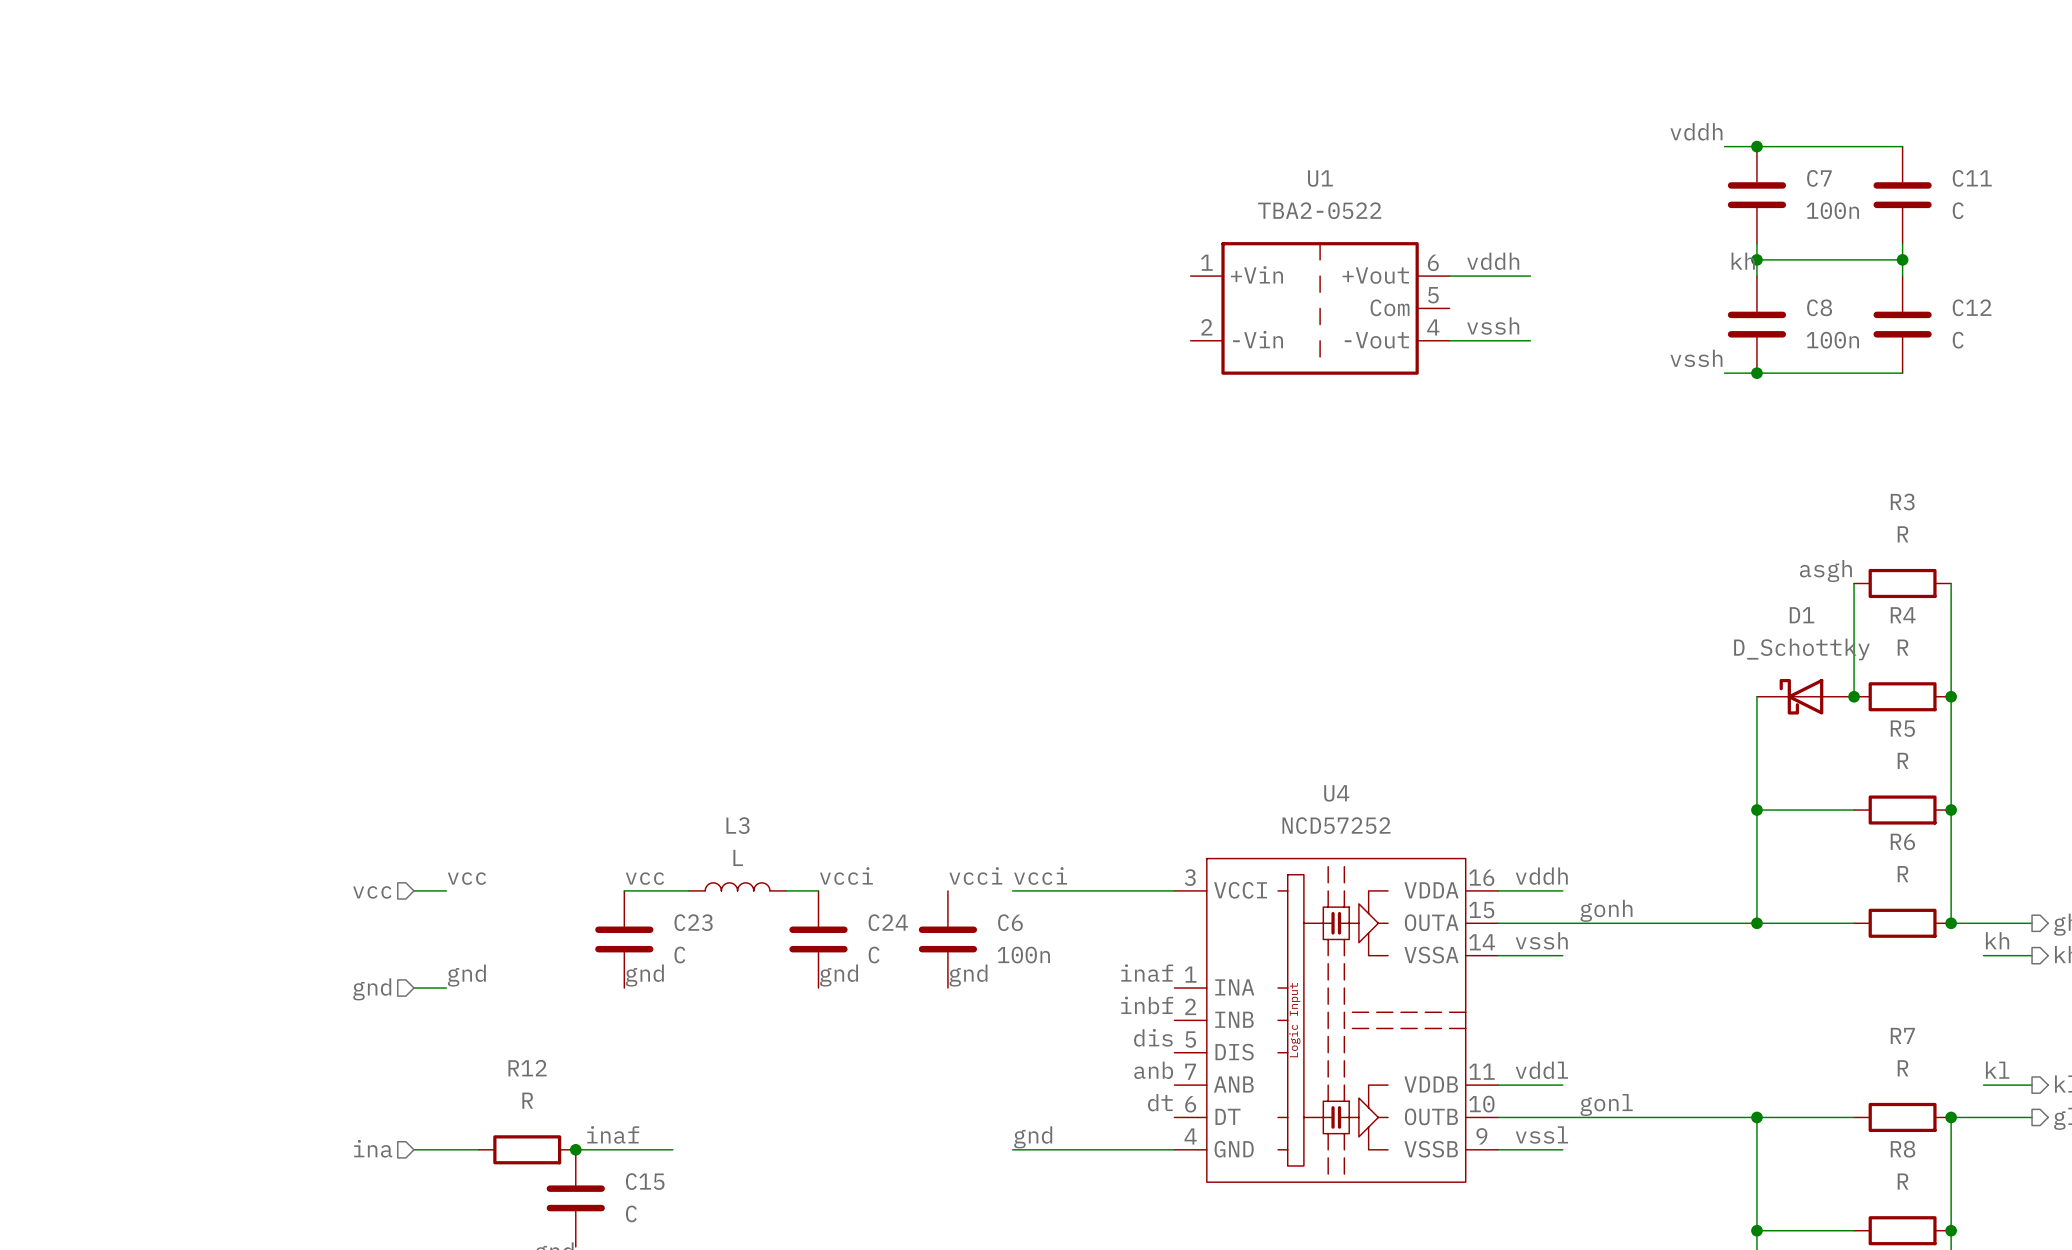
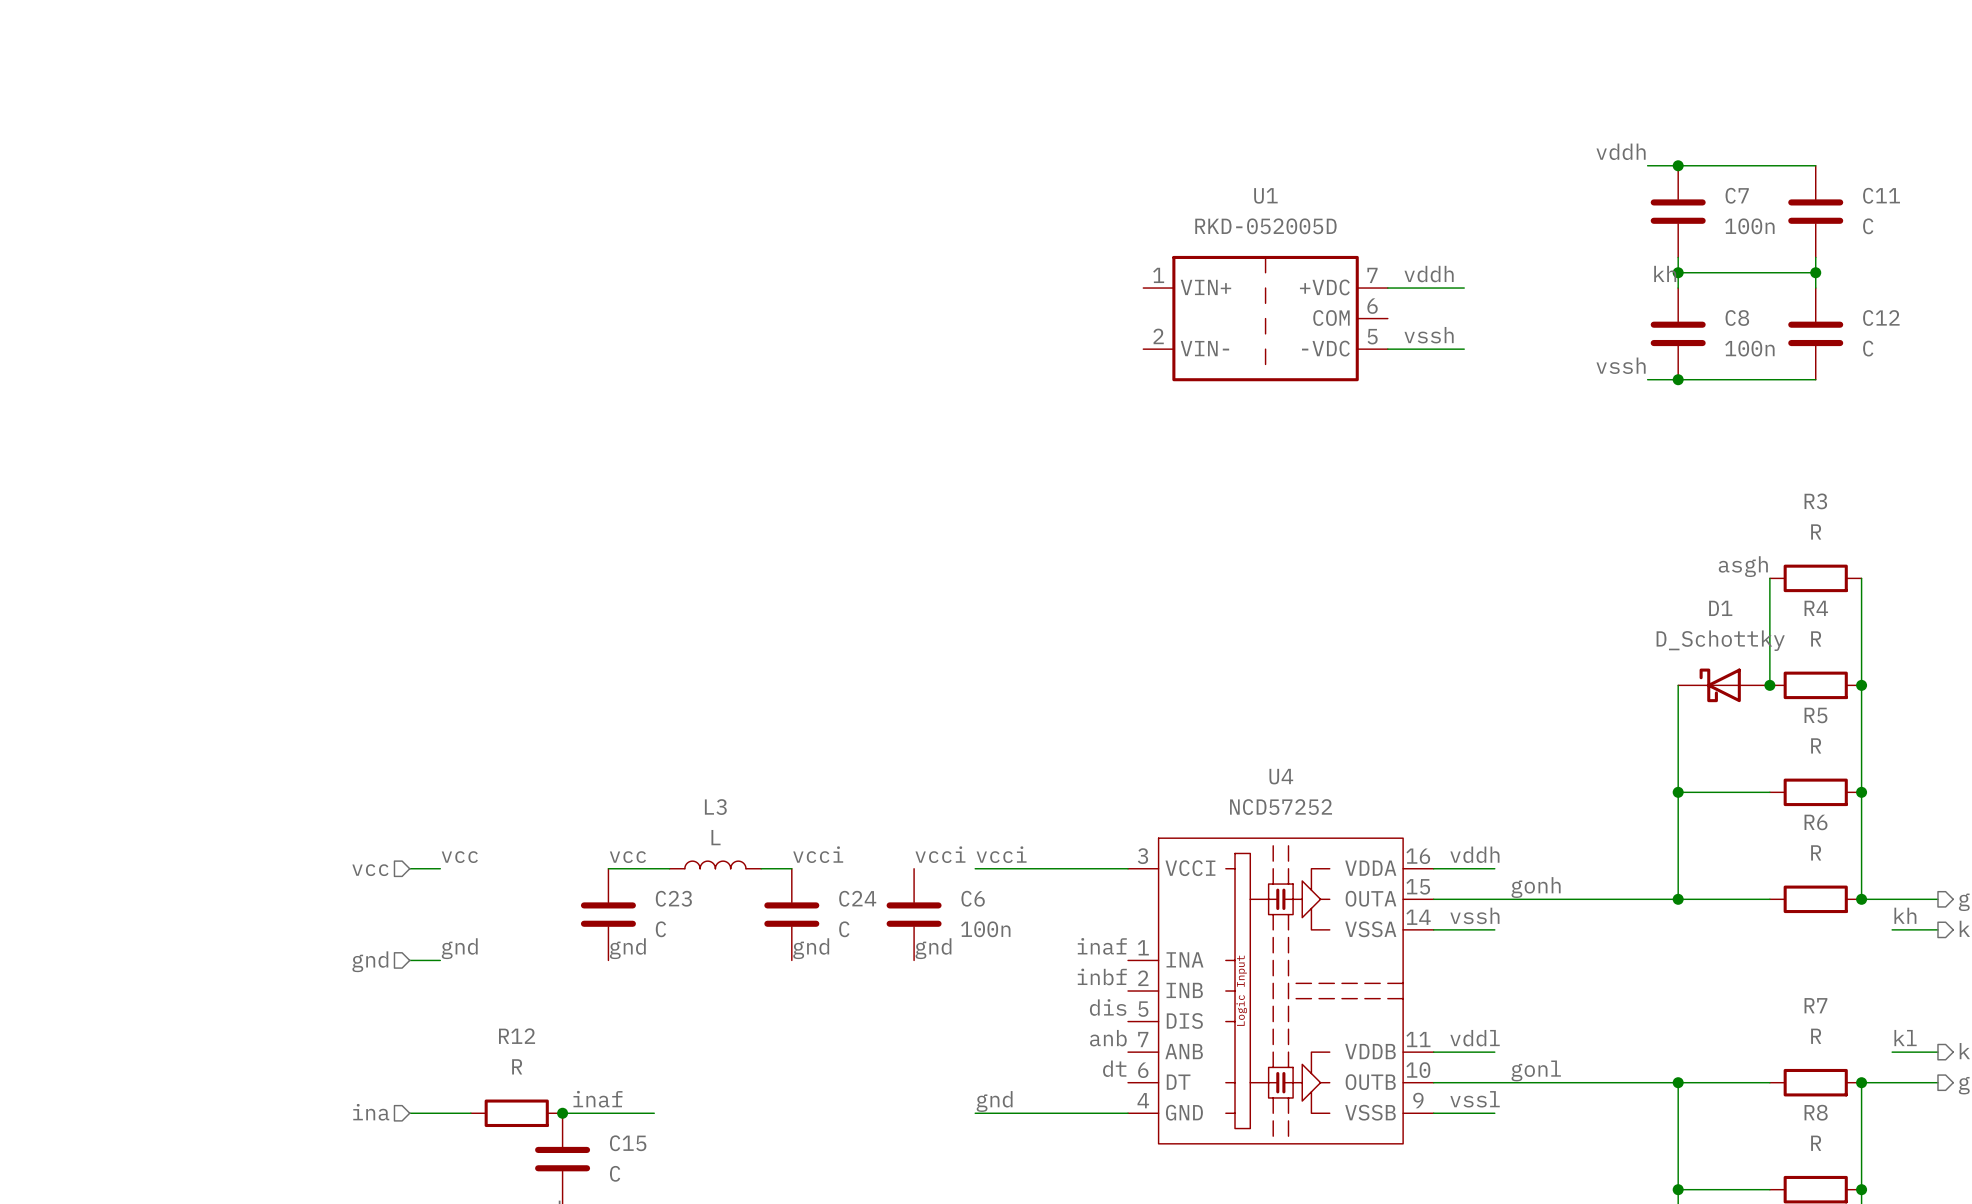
U1 value: TBA2-0522 (1319, 210) -> RKD-052005D (1265, 226)
U1 pin number: 6 (1433, 262) -> 7 (1372, 275)
U1 pin name: +Vin (1256, 274) -> VIN+ (1205, 287)
U1 pin name: +Vout (1375, 275) -> +VDC (1324, 287)
U1 pin number: 5 (1433, 295) -> 6 (1372, 306)
U1 pin name: Com (1390, 307) -> COM (1331, 318)
U1 pin number: 4 (1433, 327) -> 5 (1372, 336)
U1 pin name: -Vin (1258, 339) -> VIN- (1204, 348)
U1 pin name: -Vout (1376, 340) -> -VDC (1325, 348)

